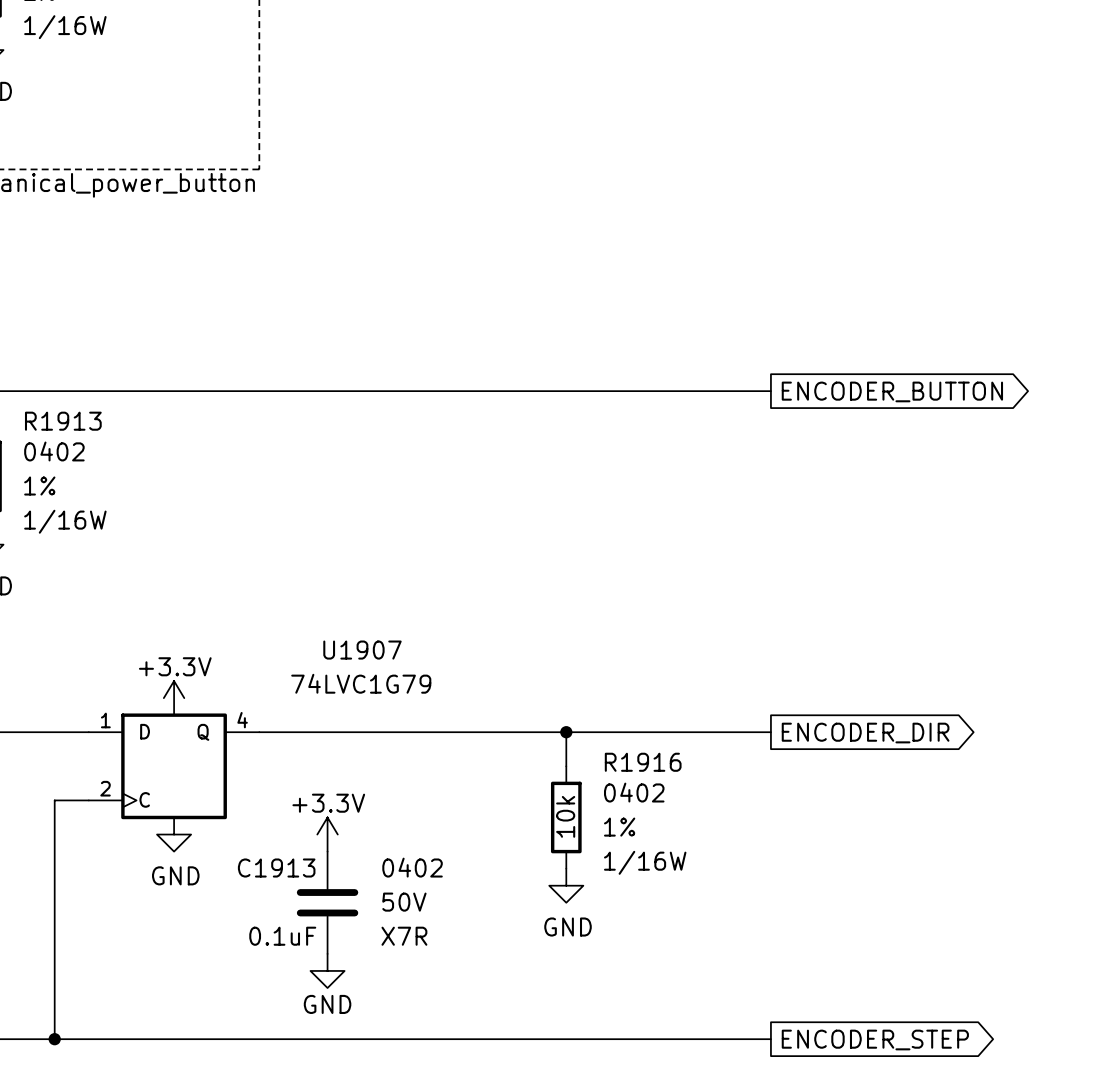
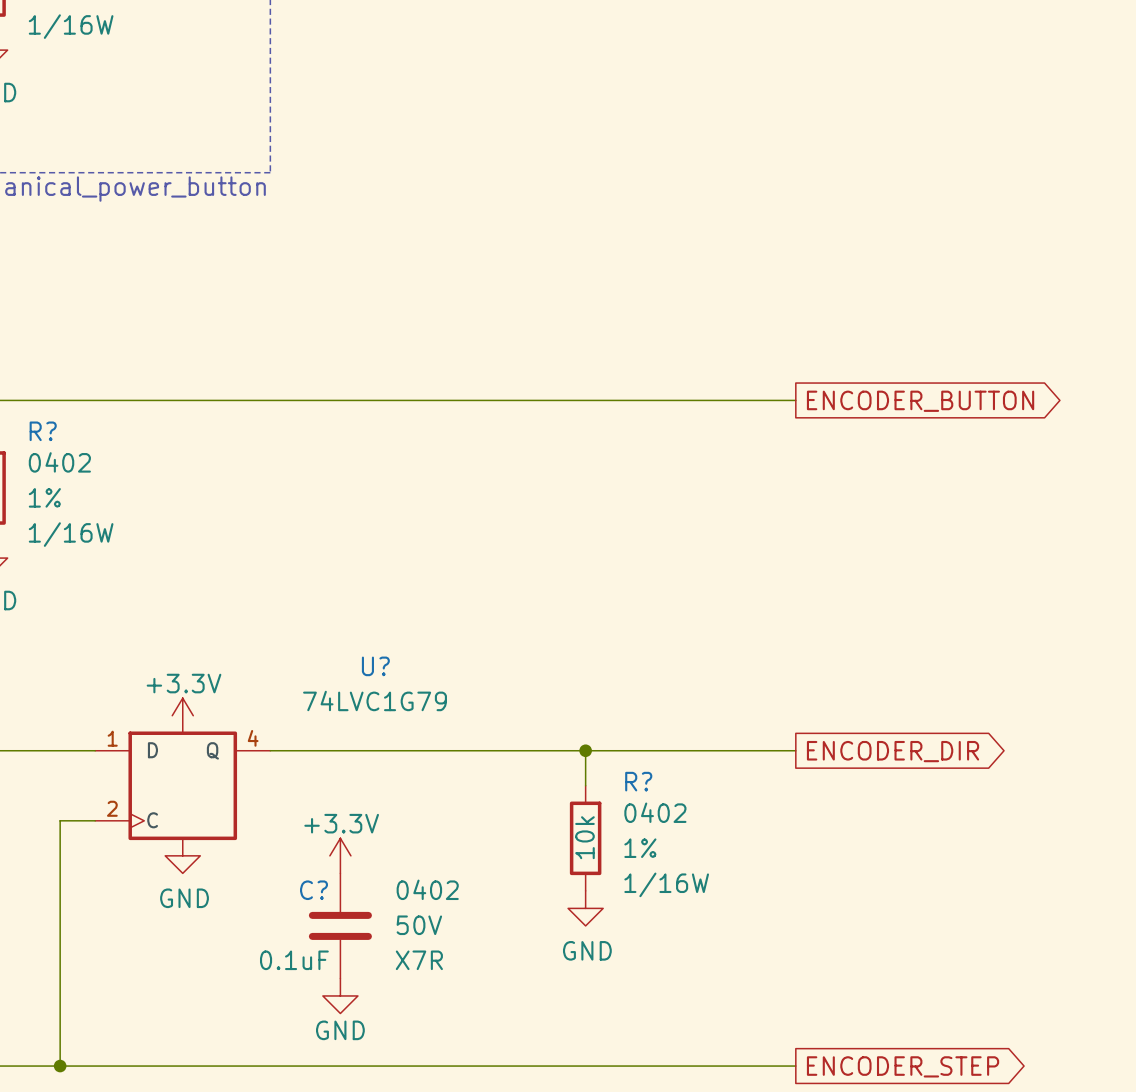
R1913 name: R1913 (63, 421) -> R? (43, 431)
U1907 name: U1907 (362, 650) -> U? (375, 666)
R1916 name: R1916 (643, 762) -> R? (638, 781)
C1913 name: C1913 (276, 868) -> C? (314, 890)

